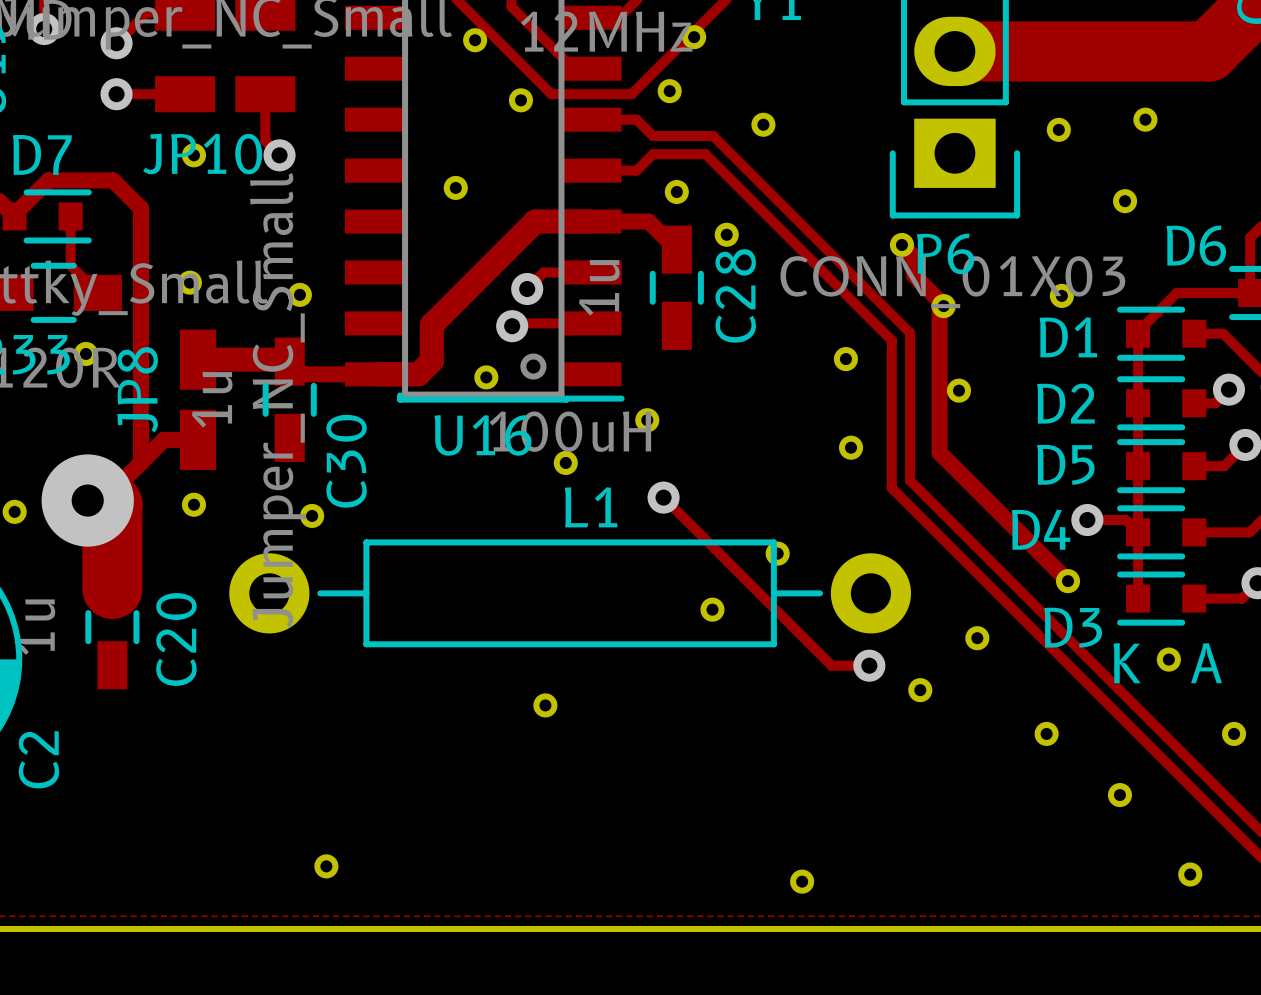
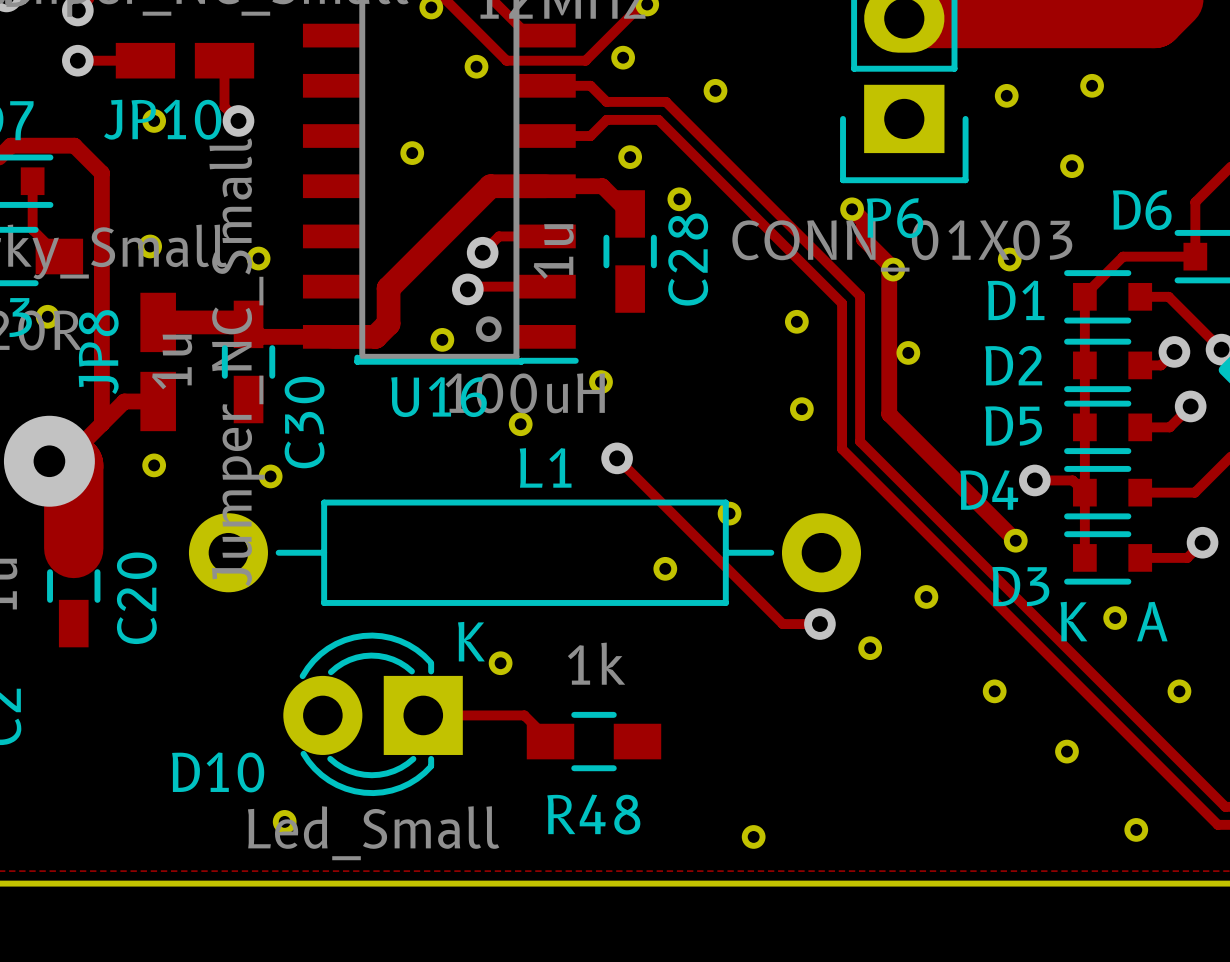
D10: none -> Led_Small (373, 714)
track: none -> (423, 715) (524, 715) (550, 741)
R48: none -> 1k (593, 741)

